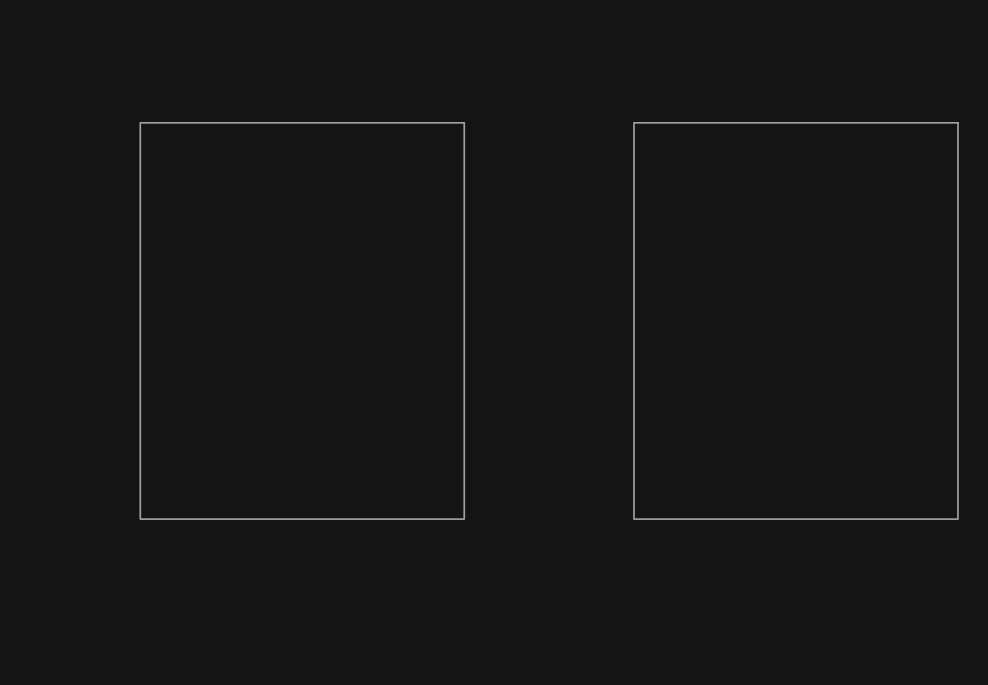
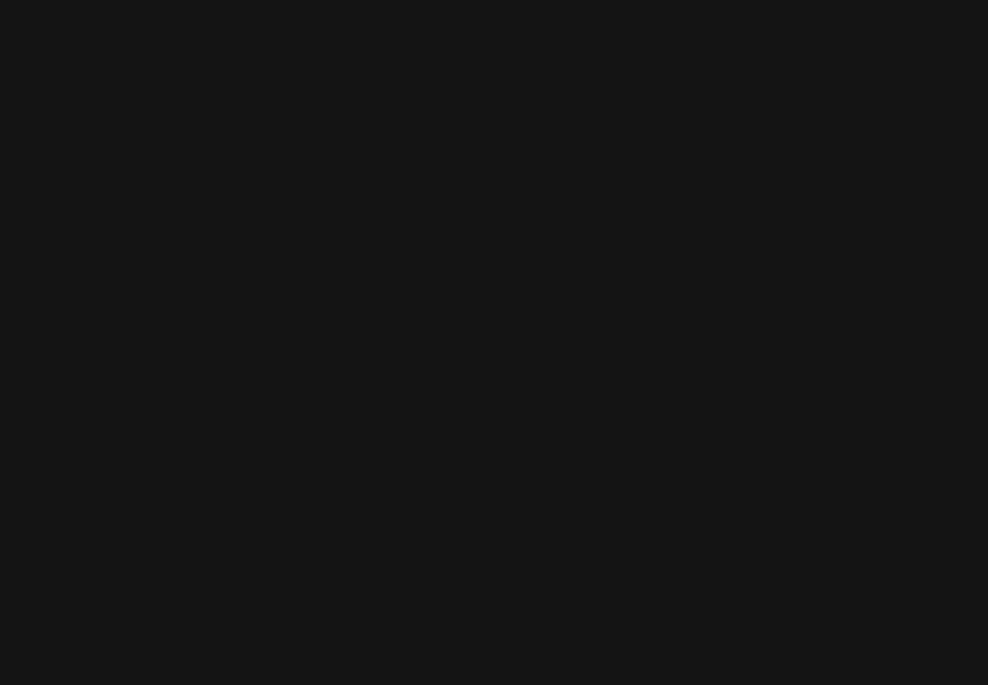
part: (302, 320) -> none
part: (795, 320) -> none

